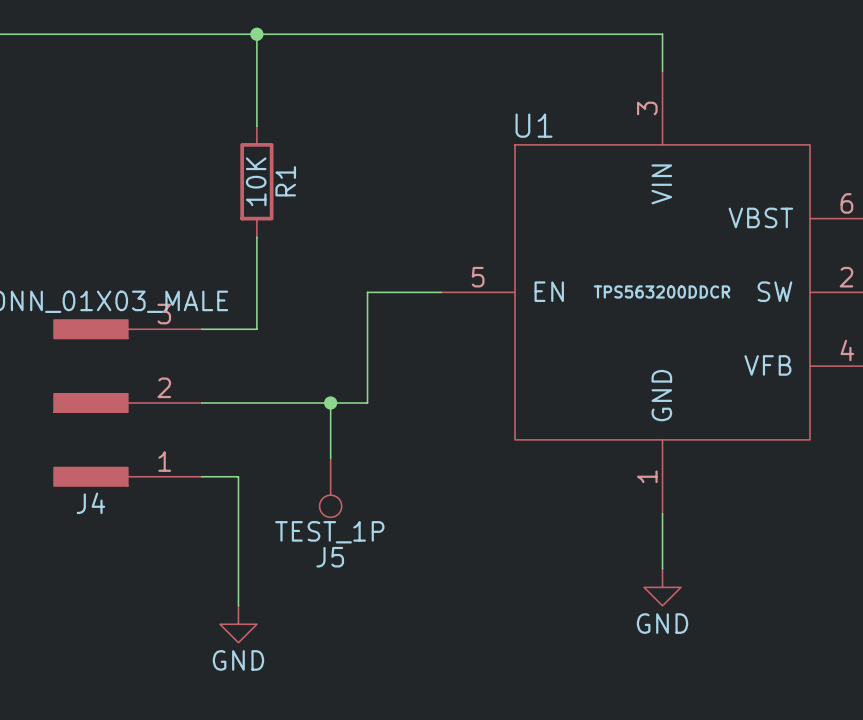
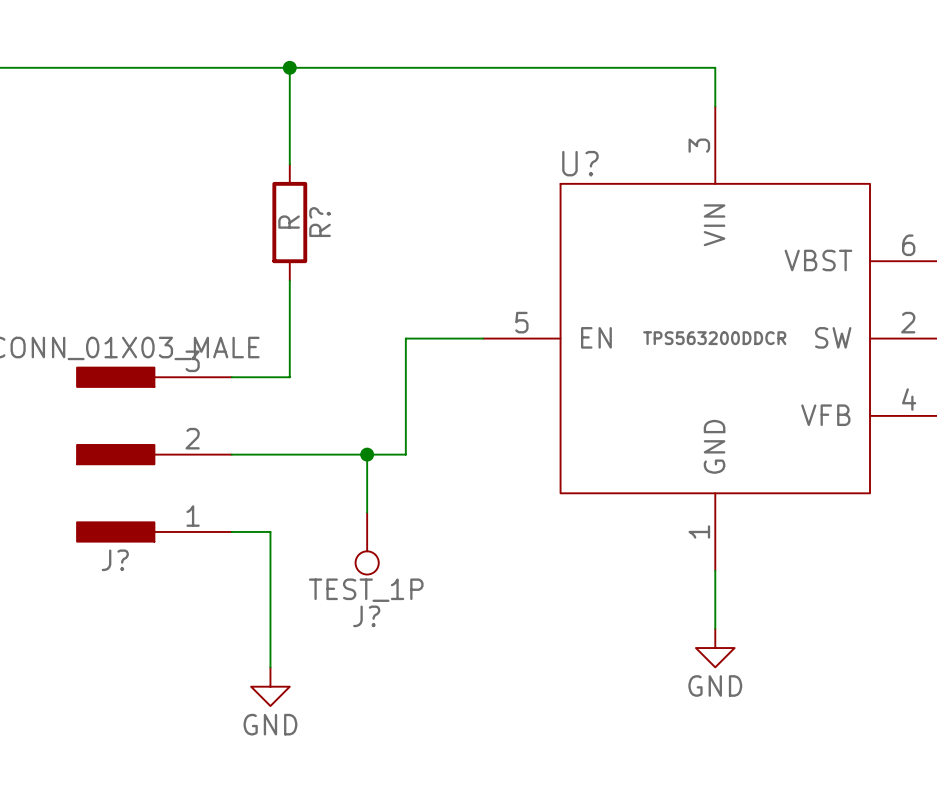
U1 name: U1 (533, 125) -> U? (580, 163)
R1 value: 10K (256, 181) -> R (289, 222)
R1 name: R1 (285, 181) -> R? (320, 222)
J4 name: J4 (90, 503) -> J? (115, 560)
J5 name: J5 (330, 557) -> J? (366, 616)

